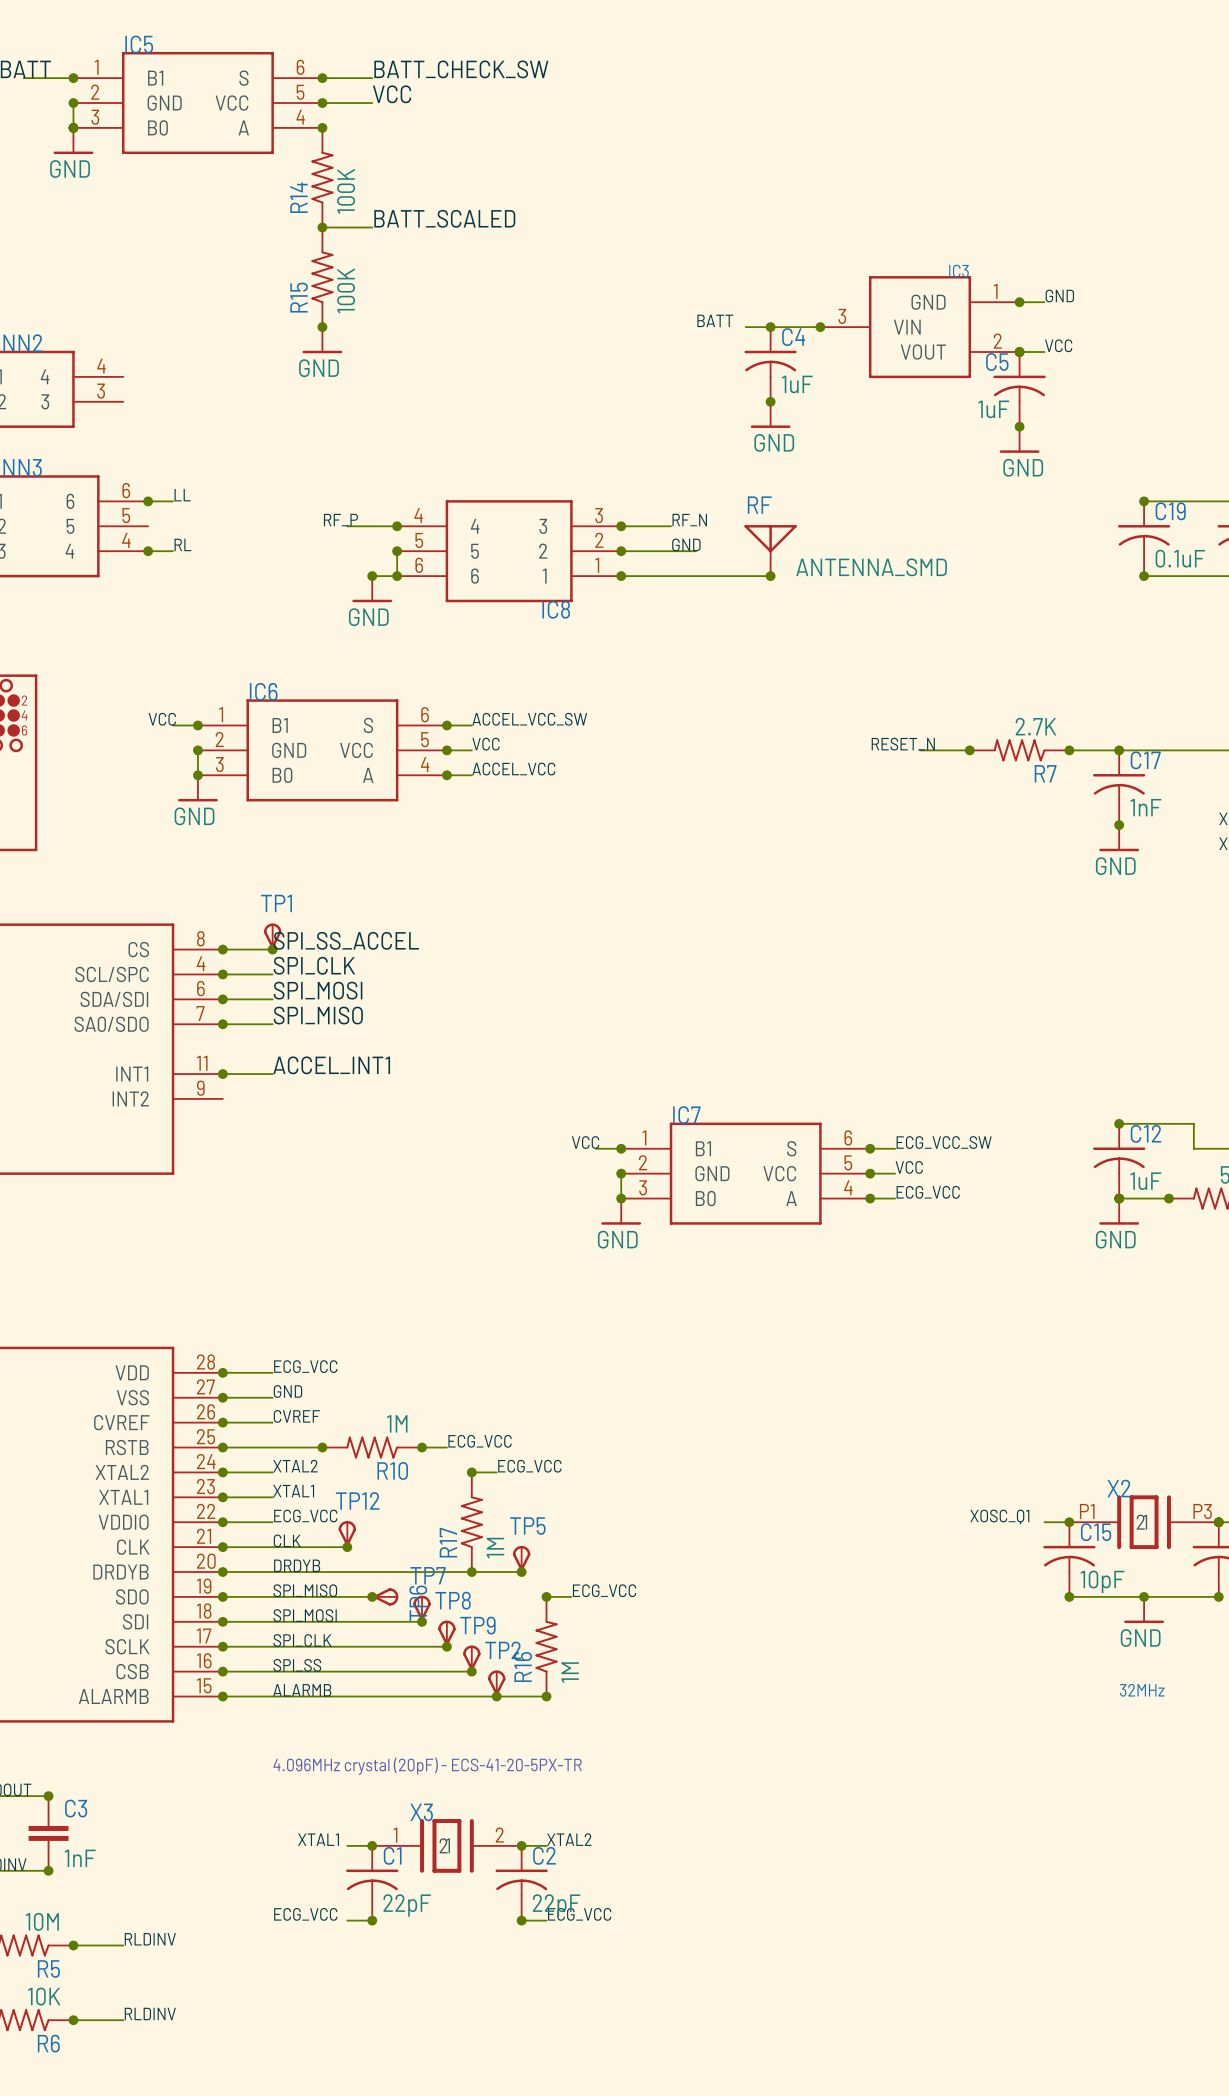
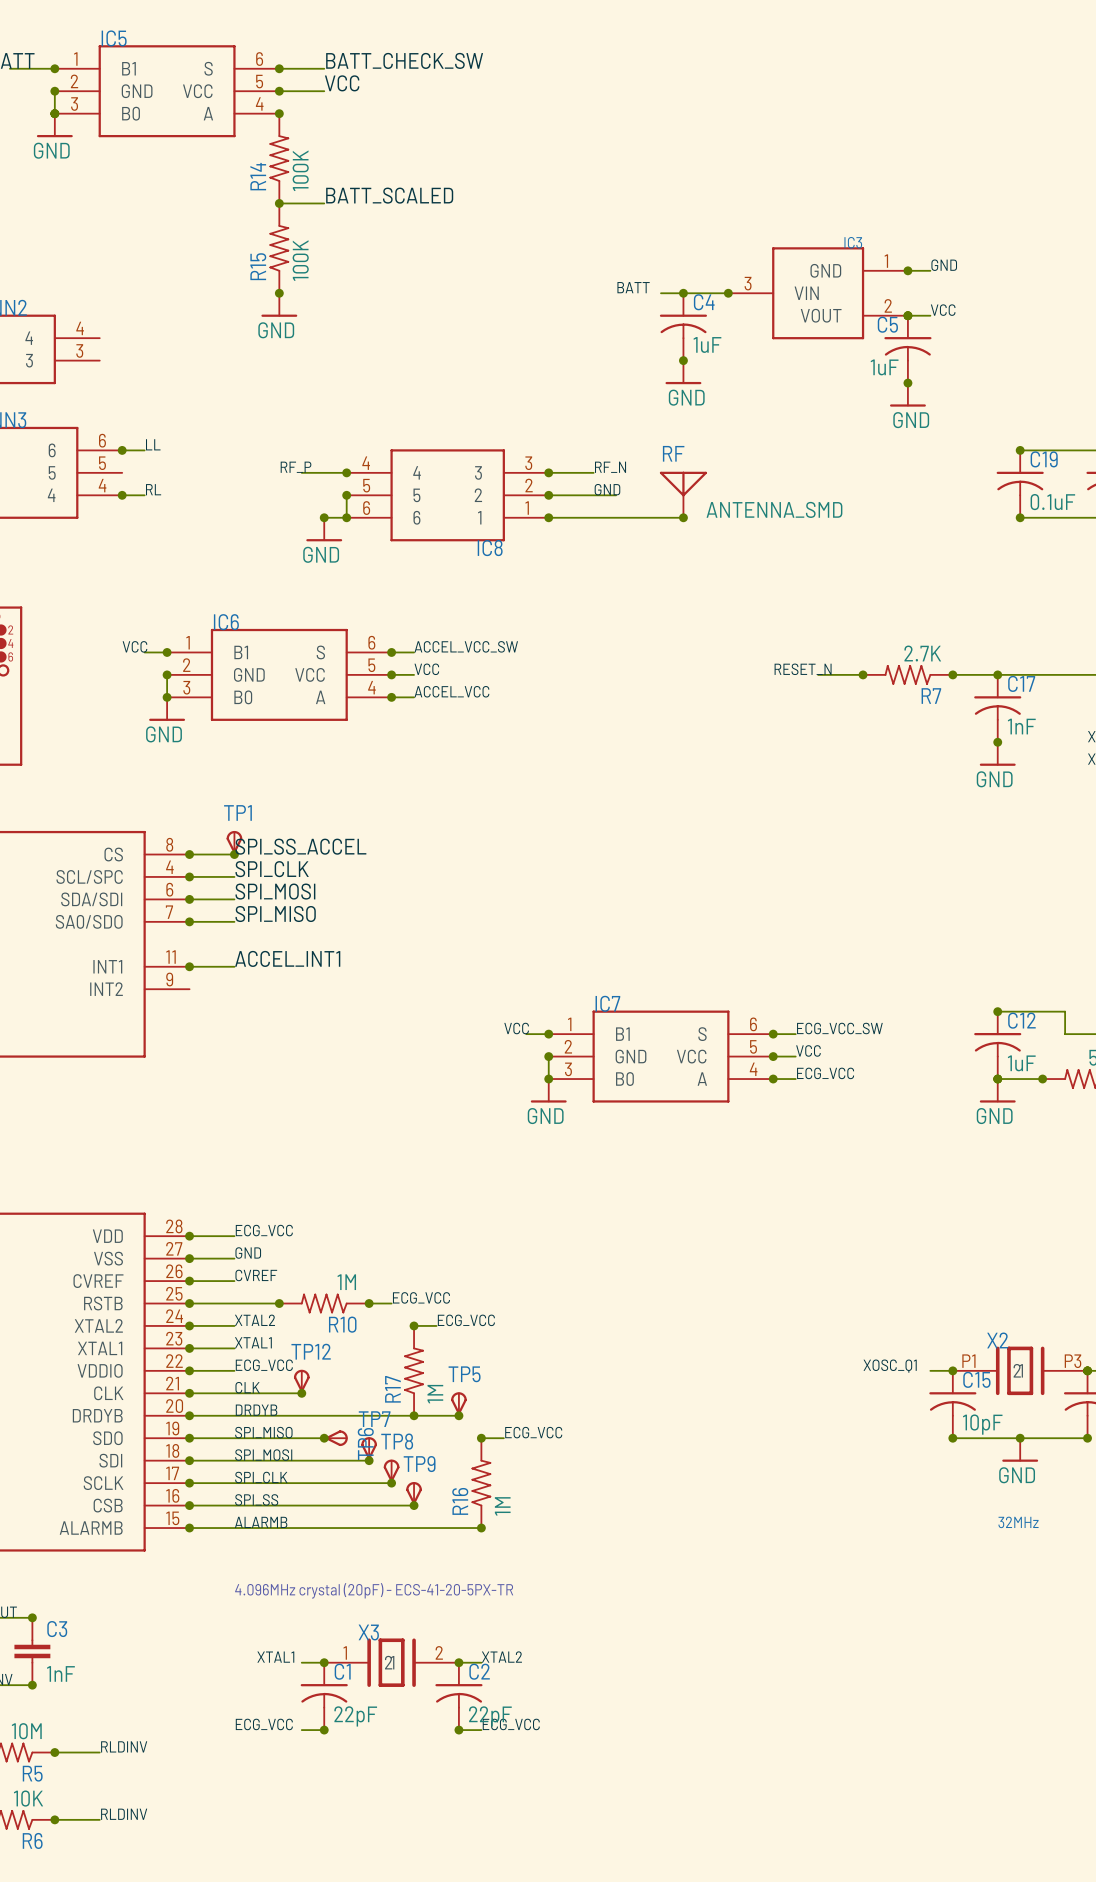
TP2: (496, 1683) -> none
junction: (496, 1696) -> none

